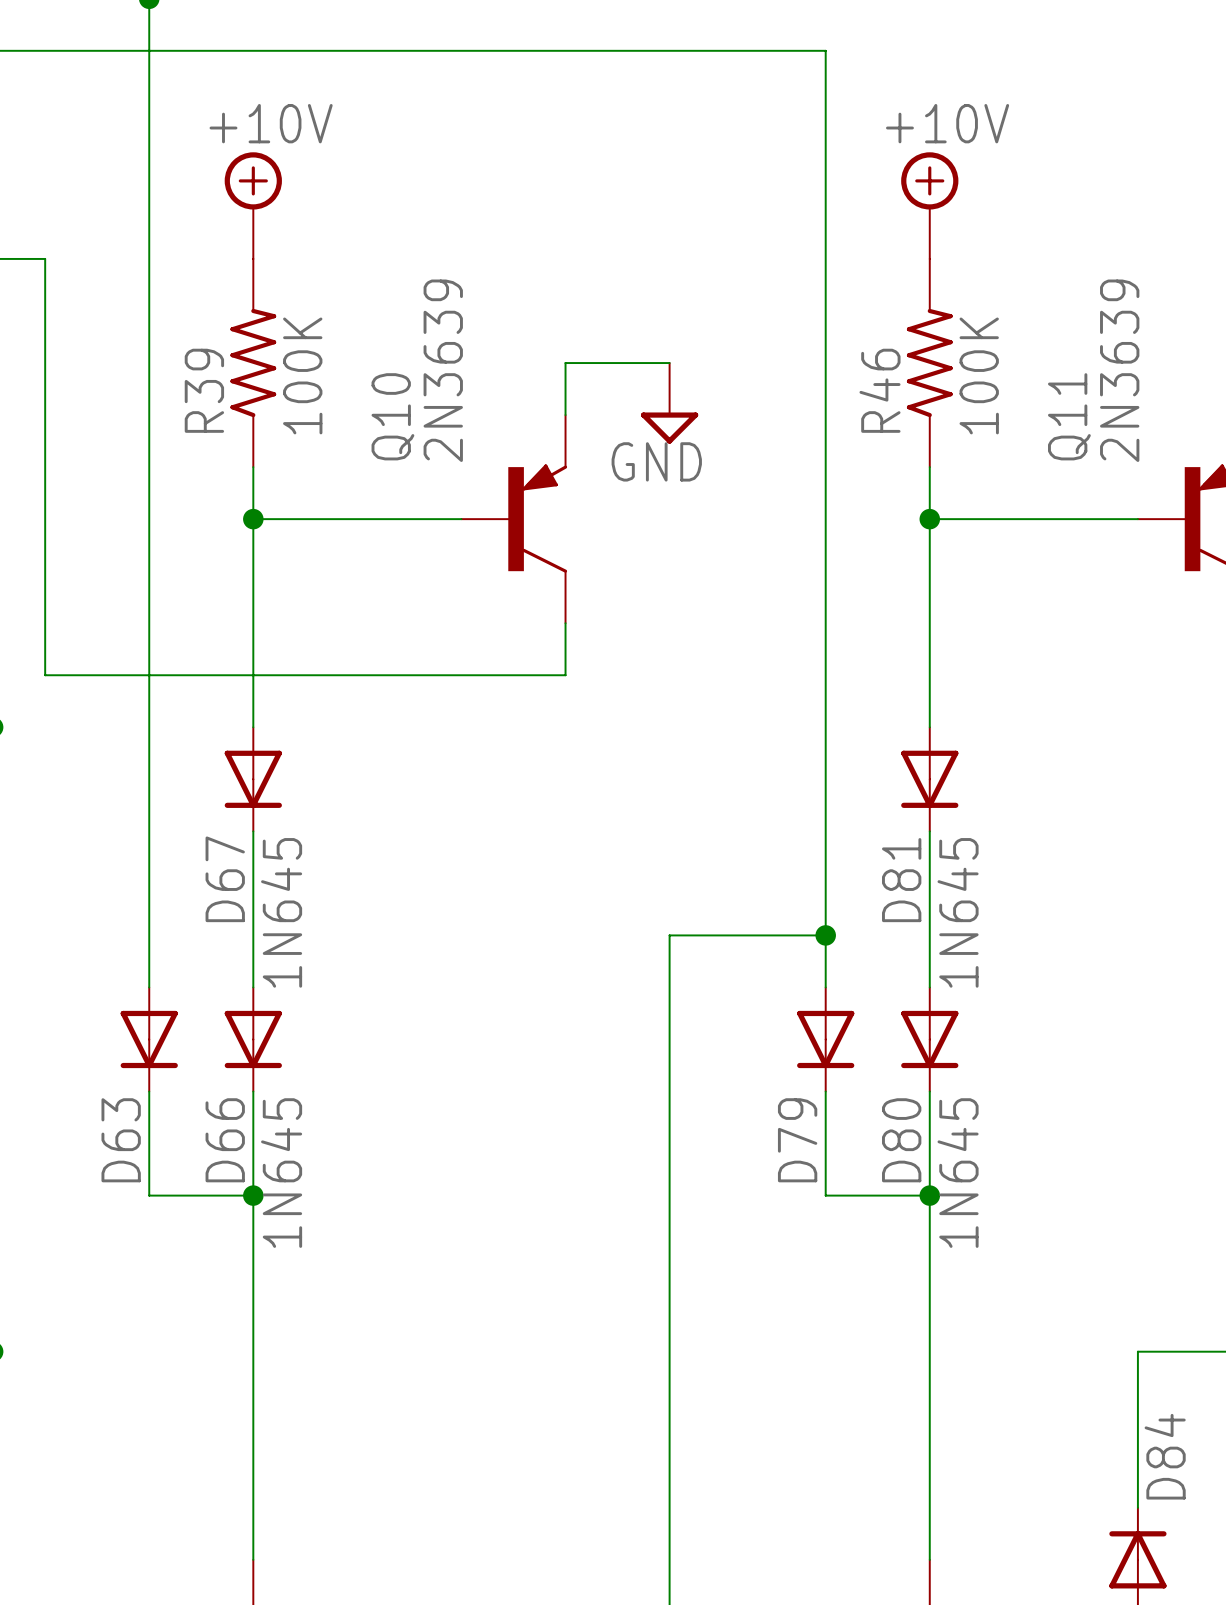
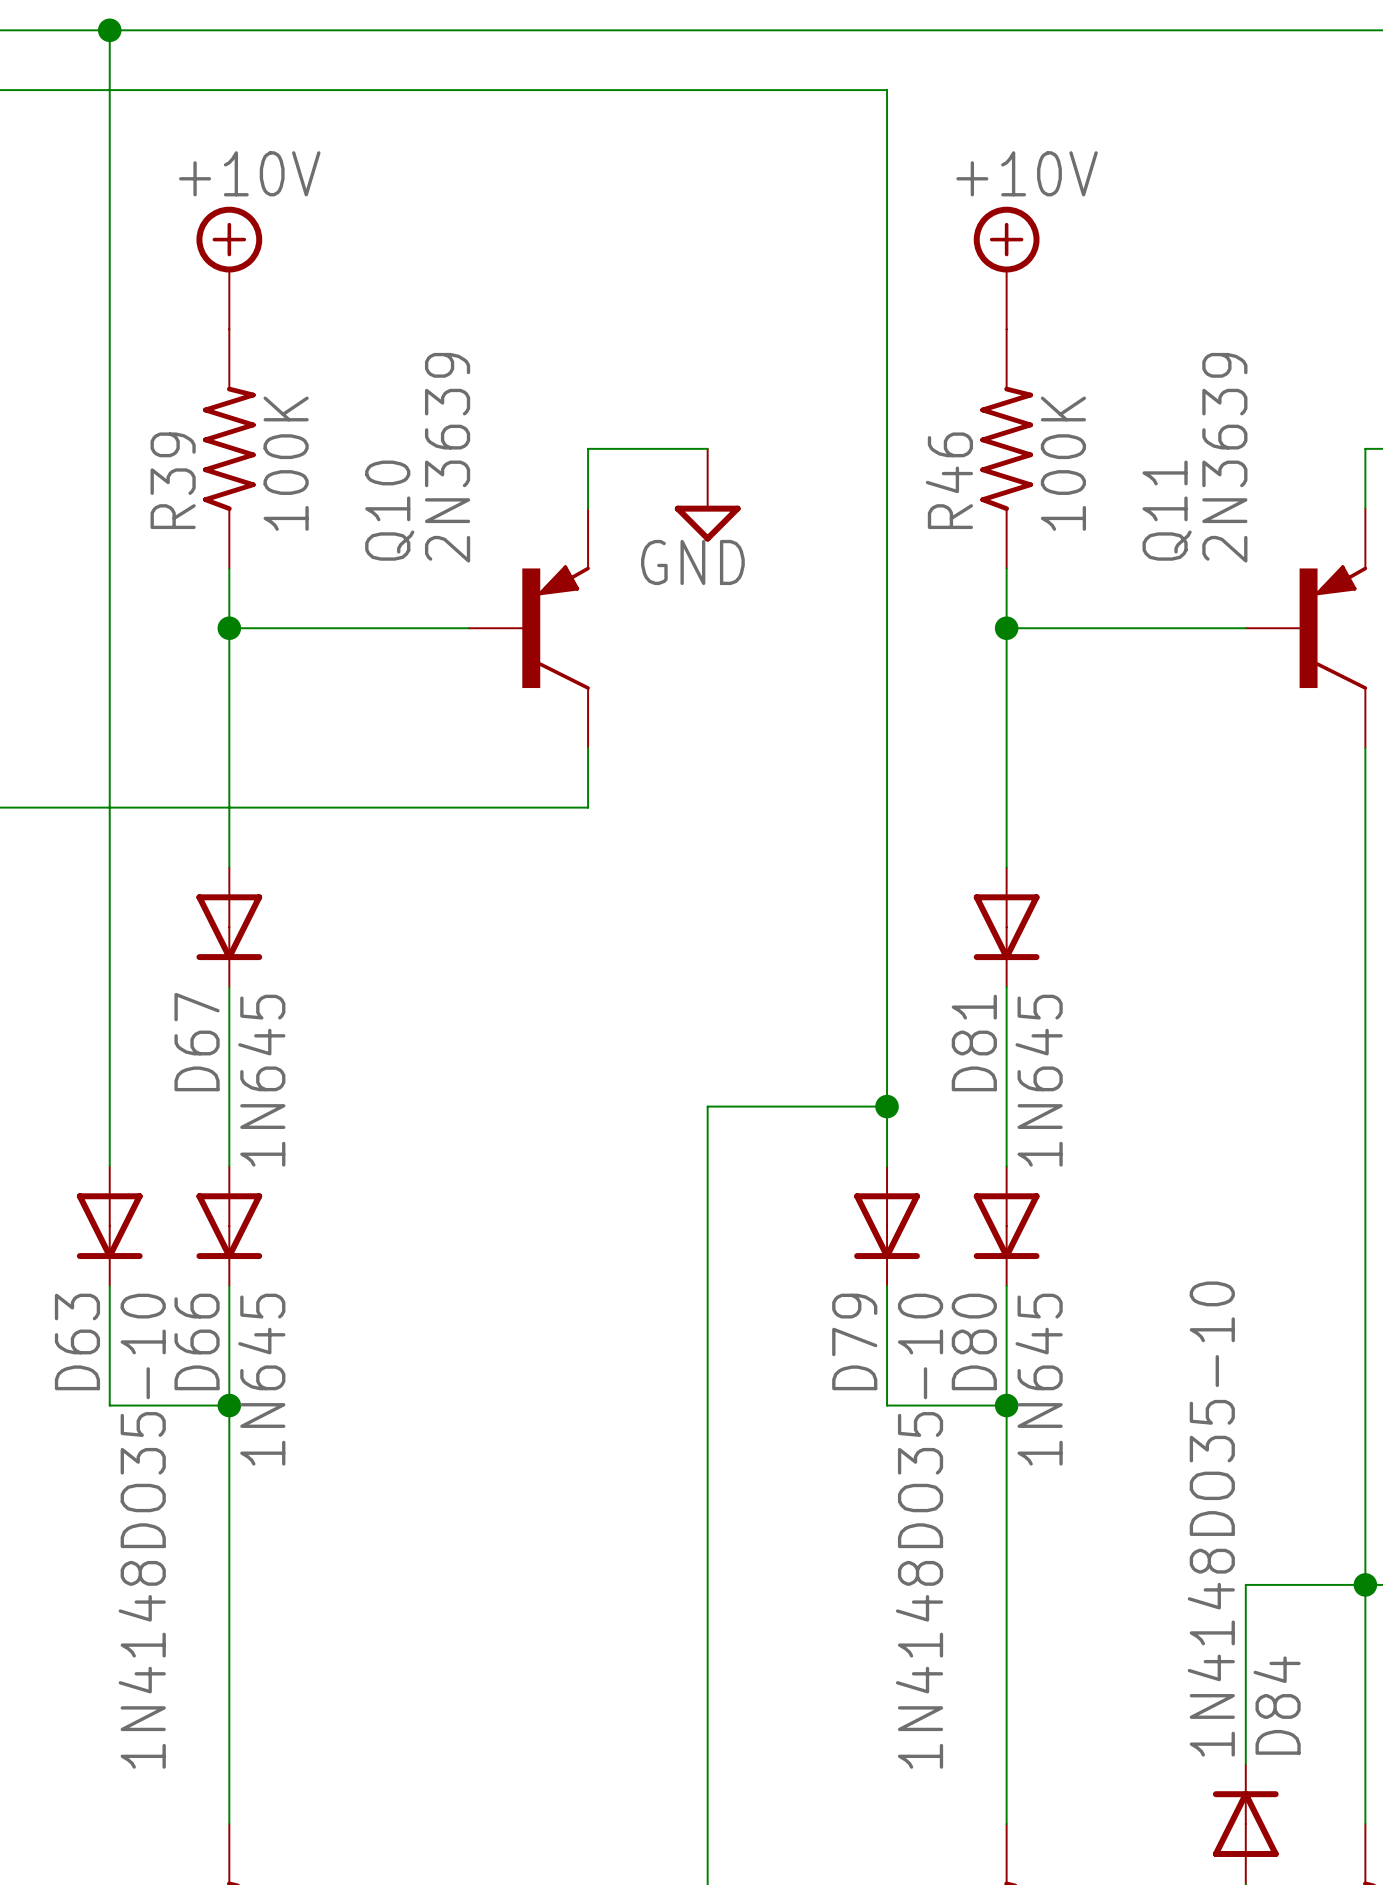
D84 value: none -> 1N4148DO35-10 (1211, 1519)
D63 value: none -> 1N4148DO35-10 (142, 1531)
D79 value: none -> 1N4148DO35-10 (919, 1531)

